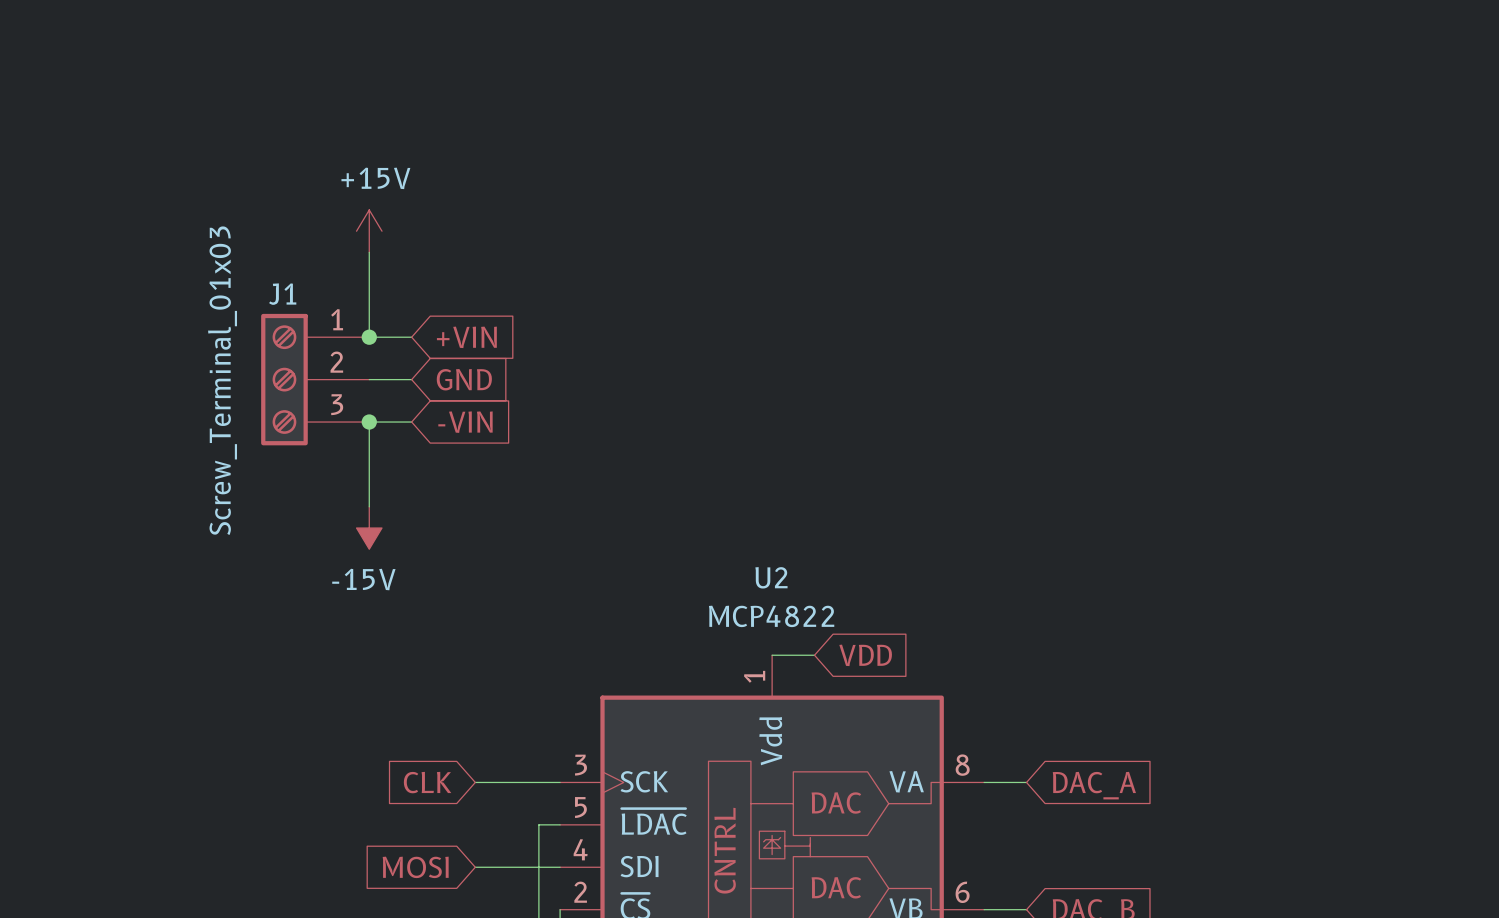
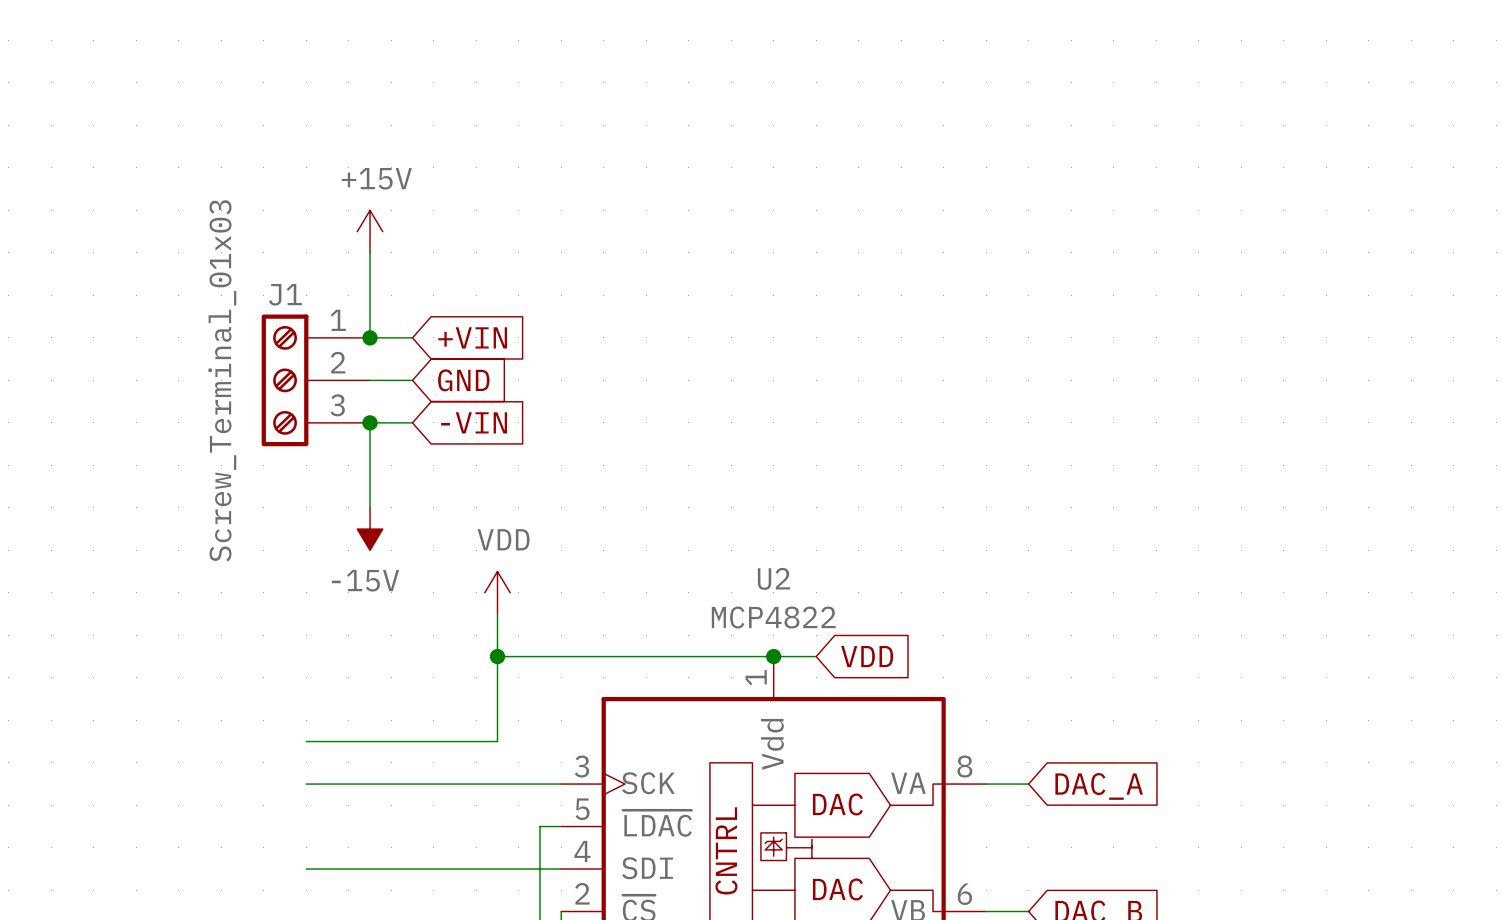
power symbol: none -> VDD (497, 592)
wire: none -> (497, 614) (497, 741) (306, 741)
wire: none -> (497, 656) (773, 656)
junction: none -> (497, 656)
junction: none -> (773, 656)
wire: none -> (306, 784) (476, 784)
global label: CLK (427, 782) -> none
wire: none -> (306, 869) (476, 869)
global label: MOSI (415, 867) -> none

